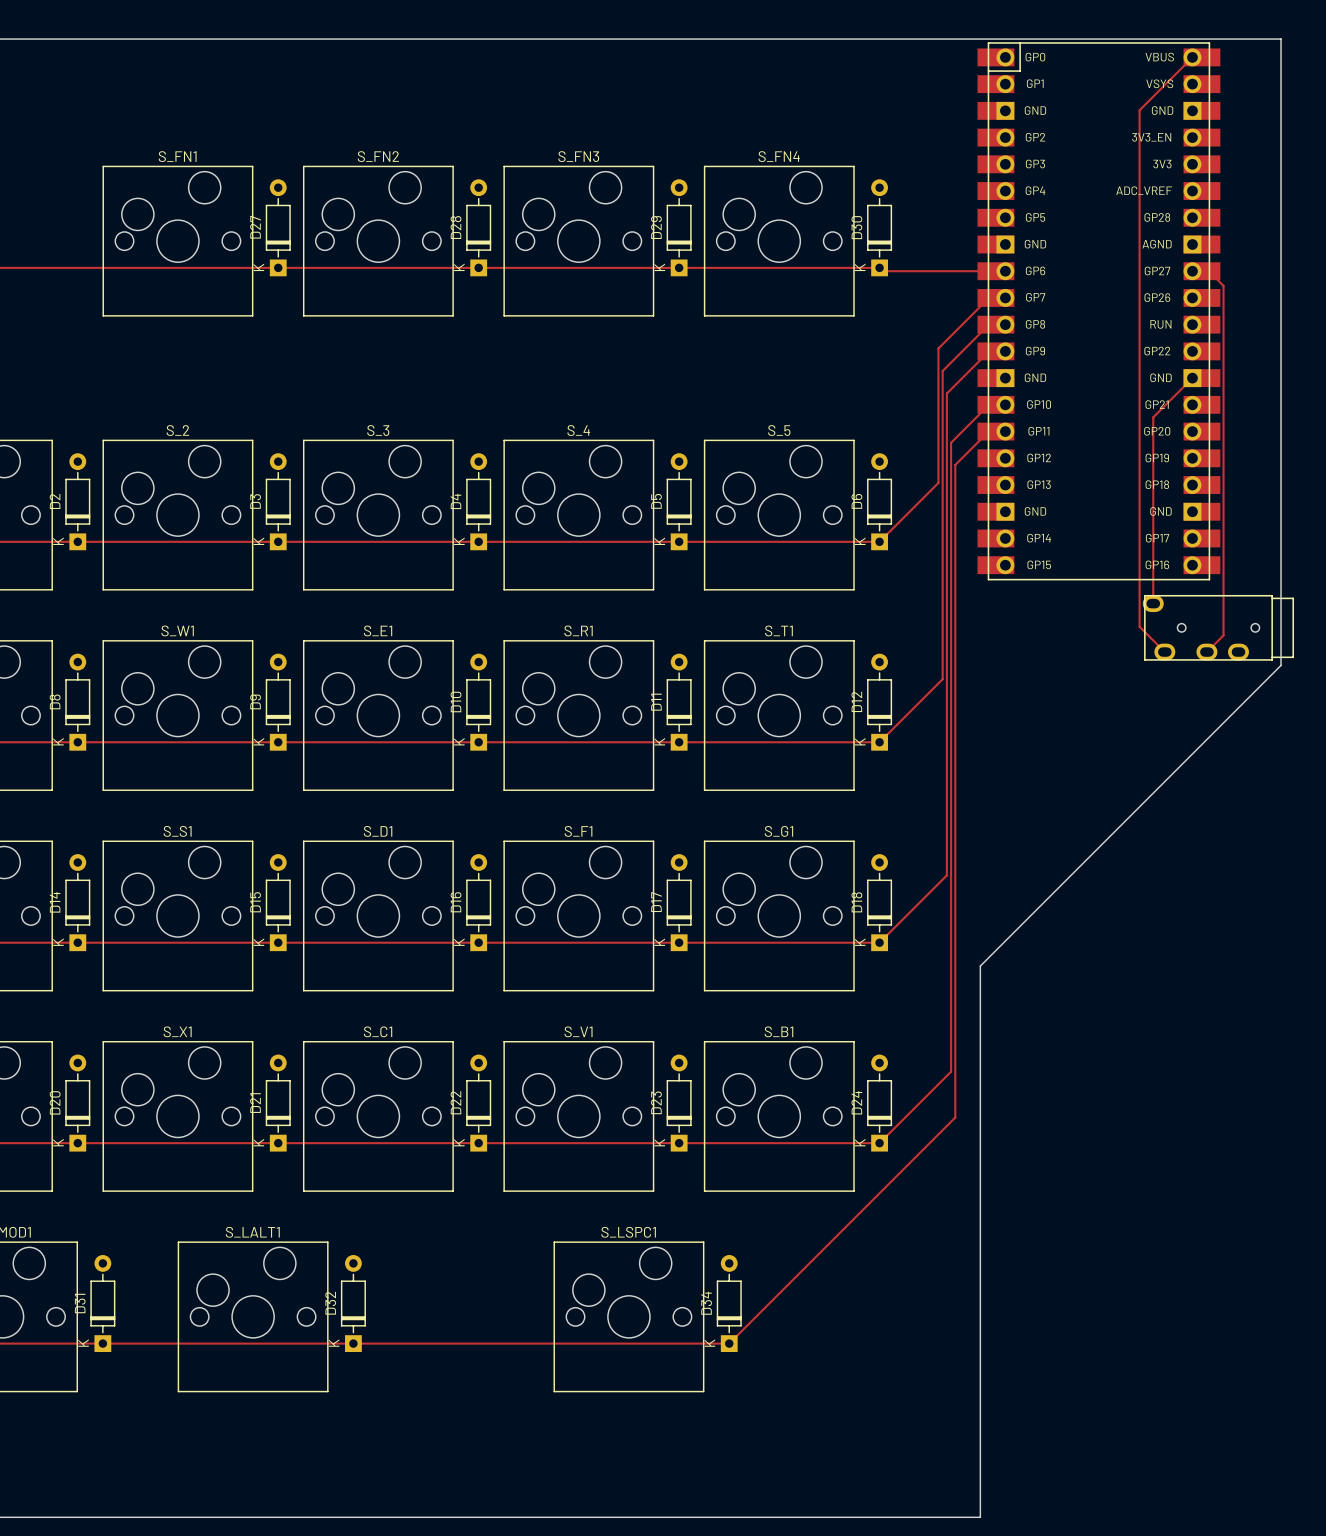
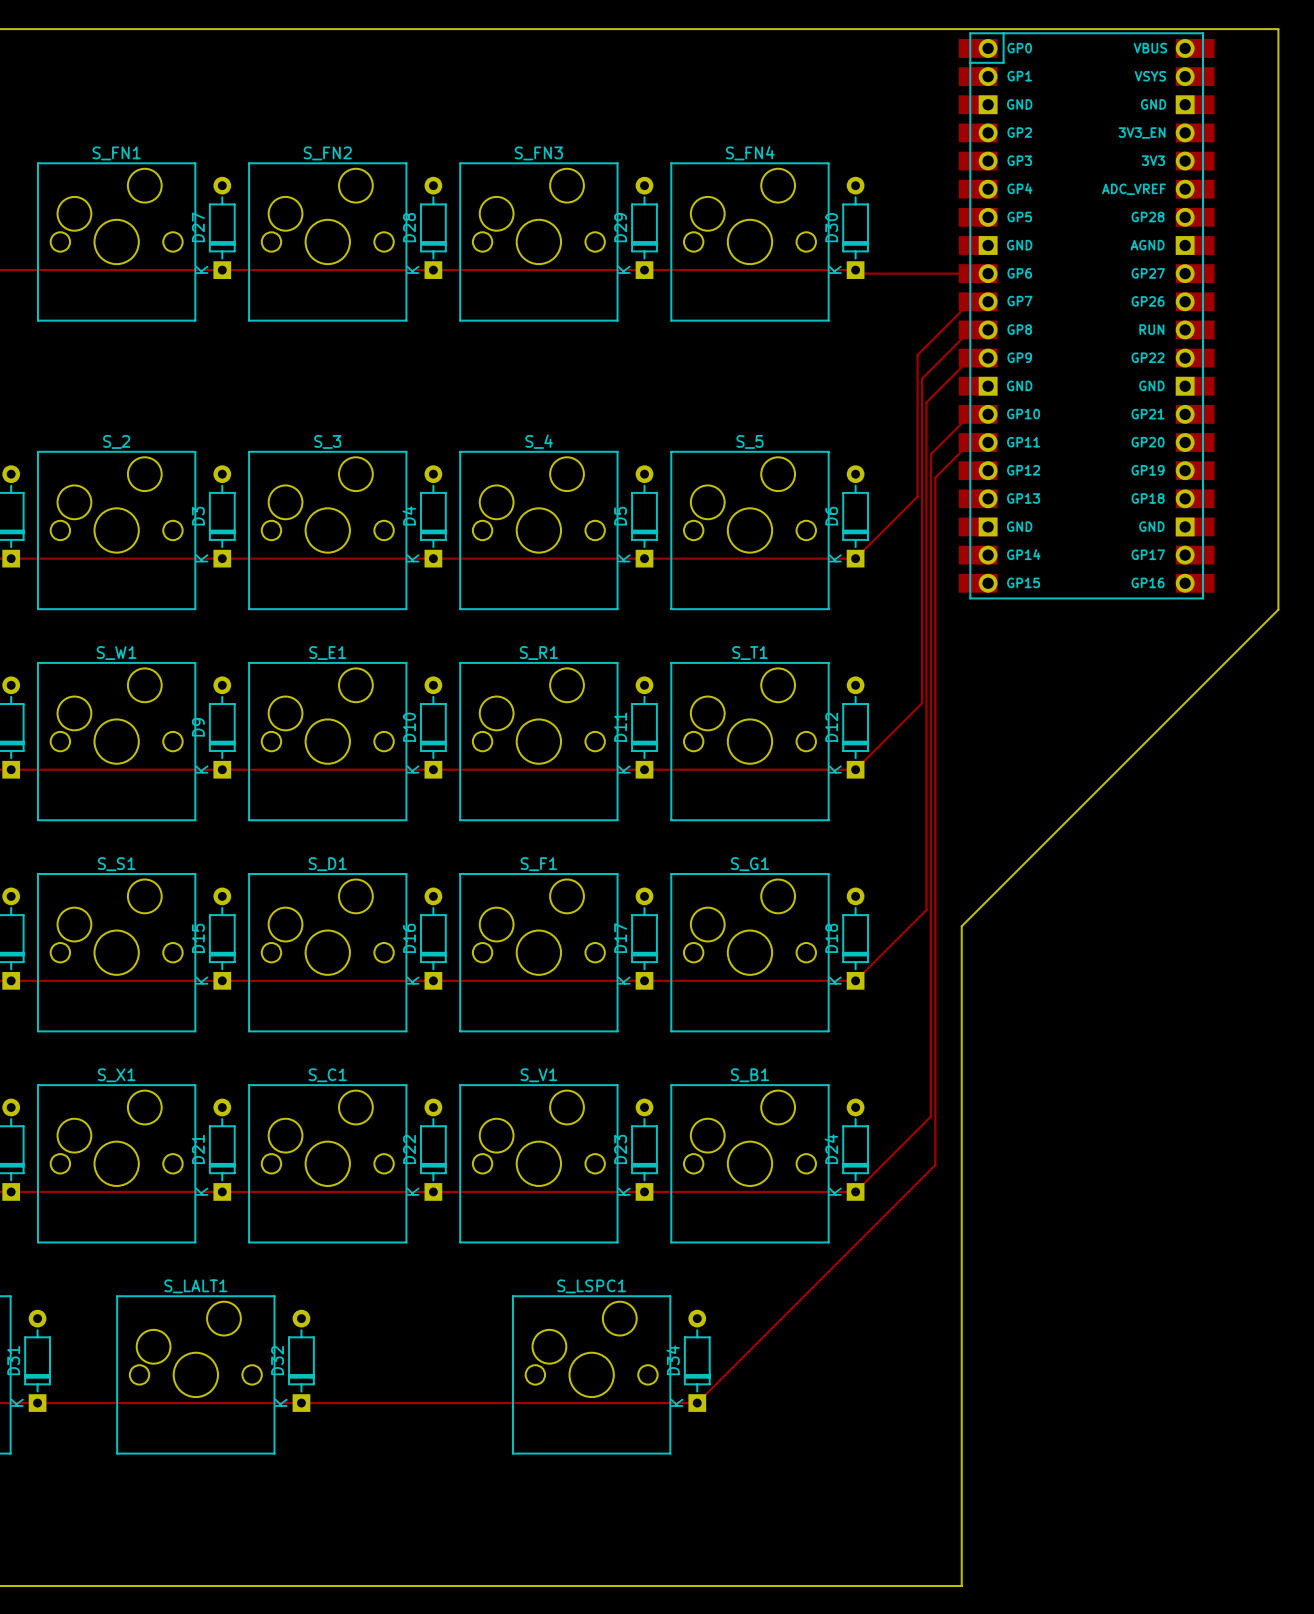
track: (1192, 57) (1139, 110) (1139, 626) (1164, 652) -> none
track: (1192, 271) (1208, 271) (1223, 285) (1223, 635) (1206, 652) -> none
track: (1192, 378) (1153, 417) (1153, 603) -> none
board edge: (1281, 590) (1281, 665) (980, 966) -> (1278, 609) (961, 926) (961, 1005)
part: (1218, 627) -> none

